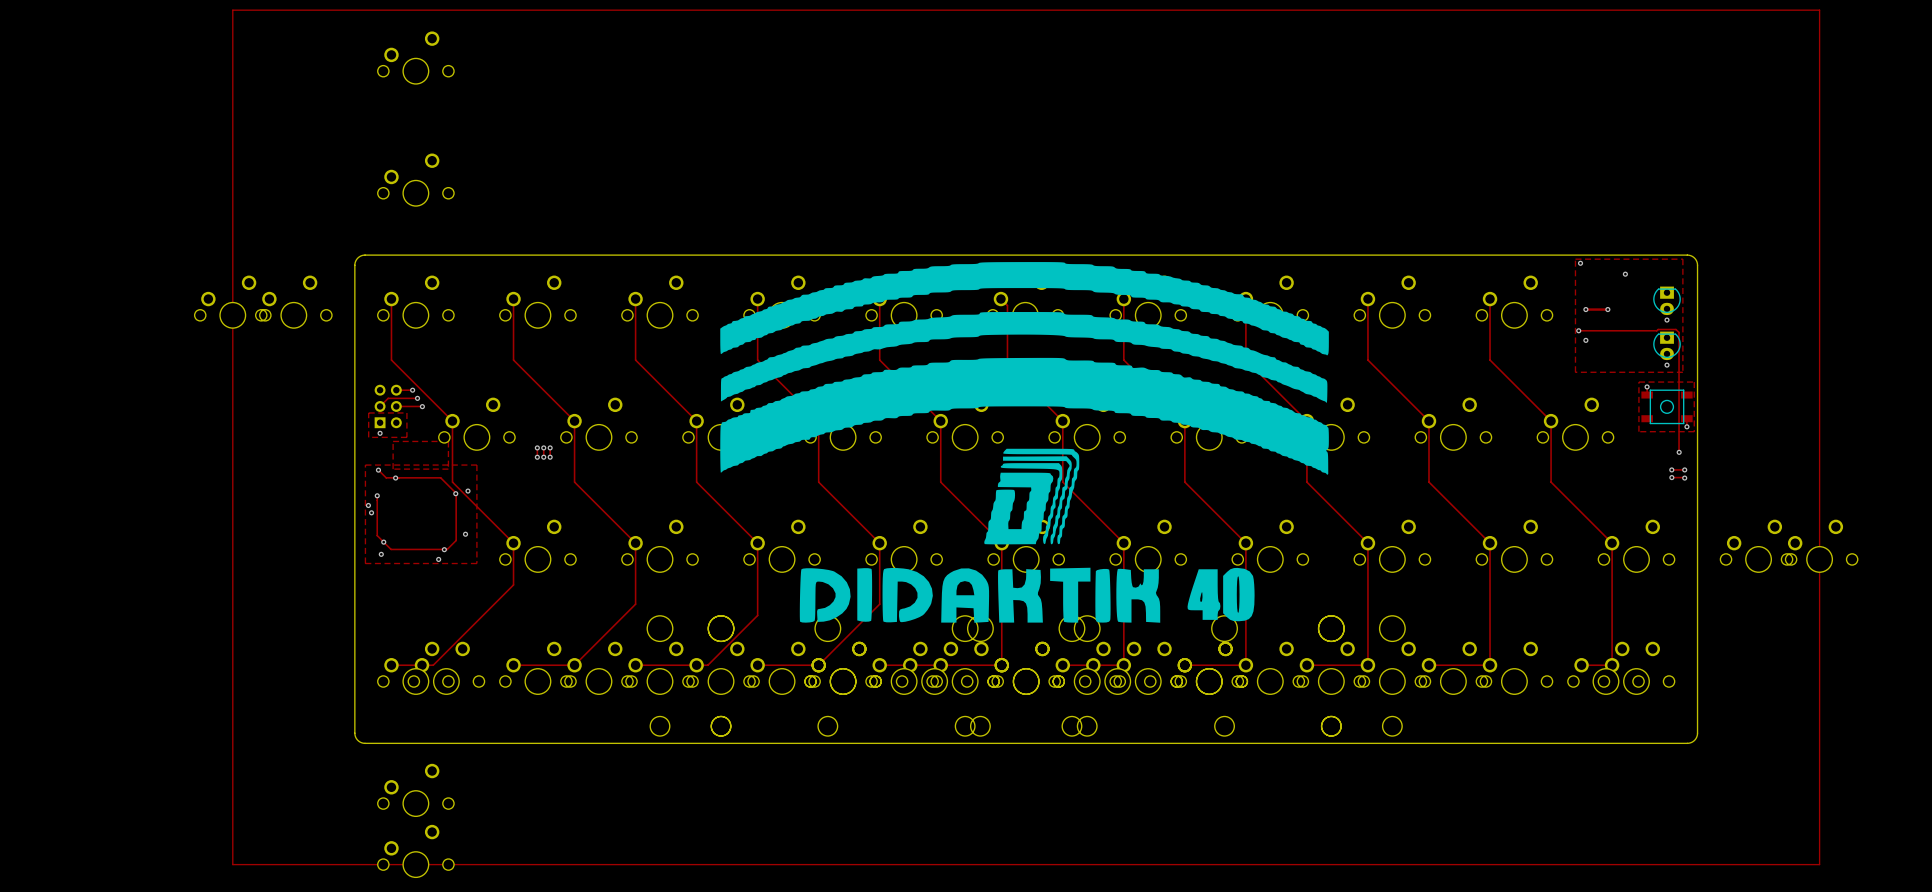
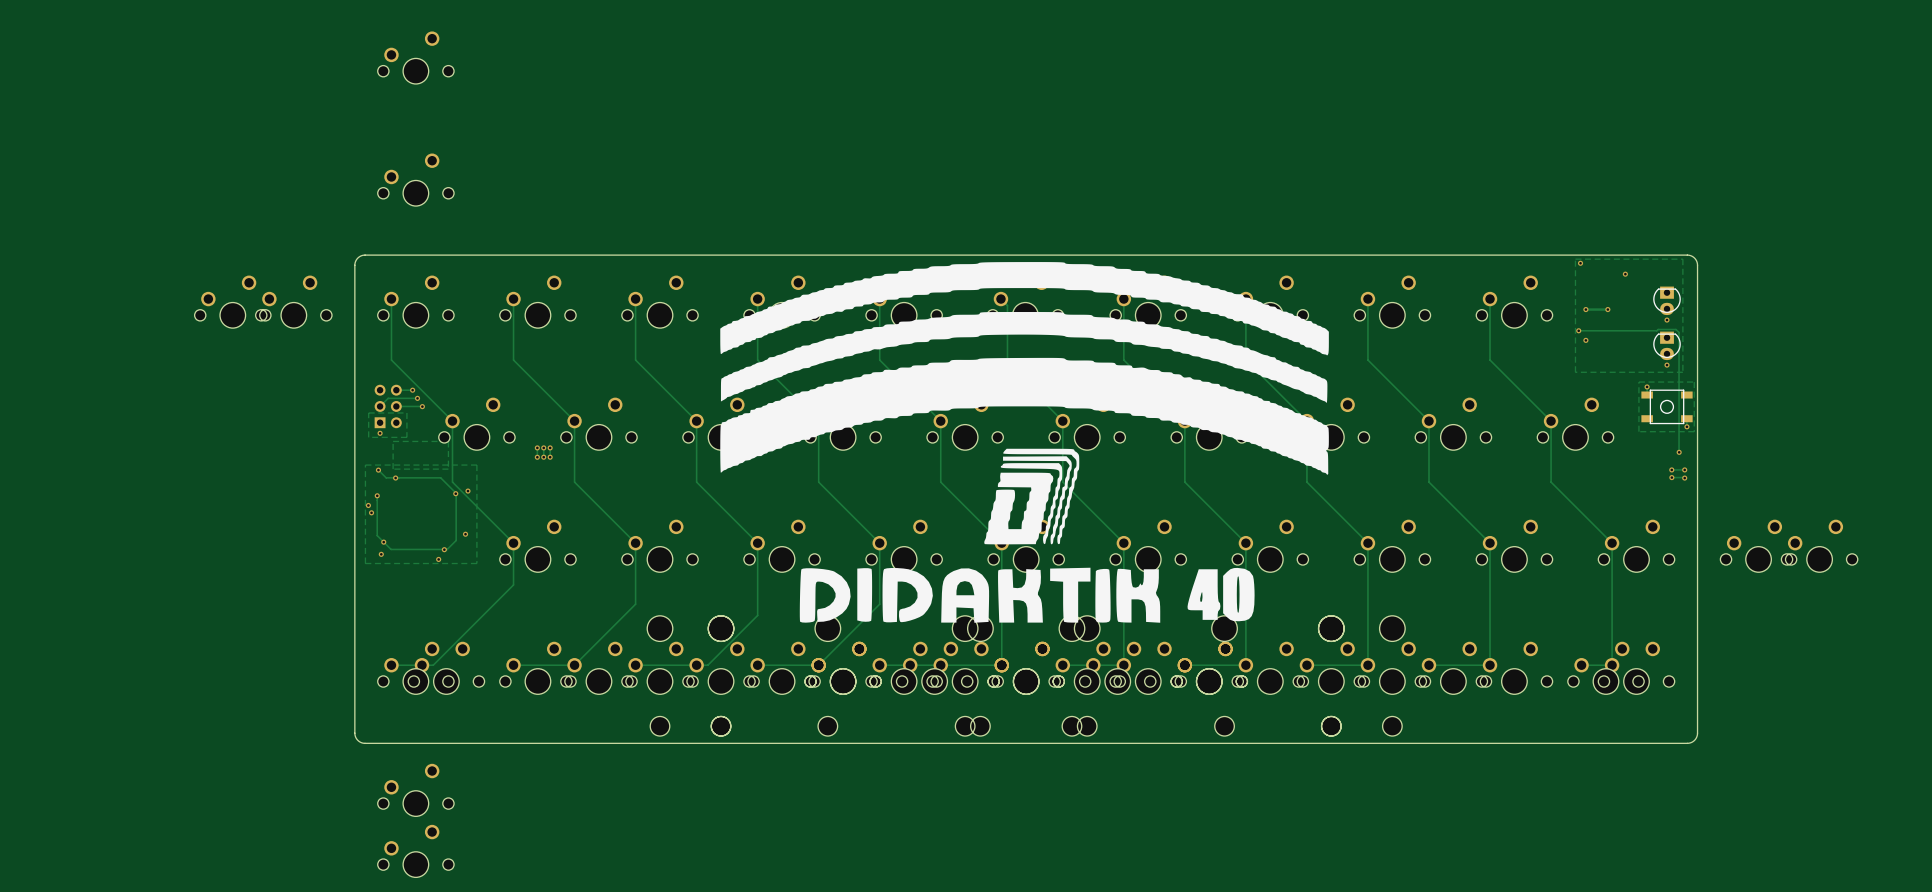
track: (232, 10) (1819, 10) (1819, 864) (232, 864) (232, 10) -> none

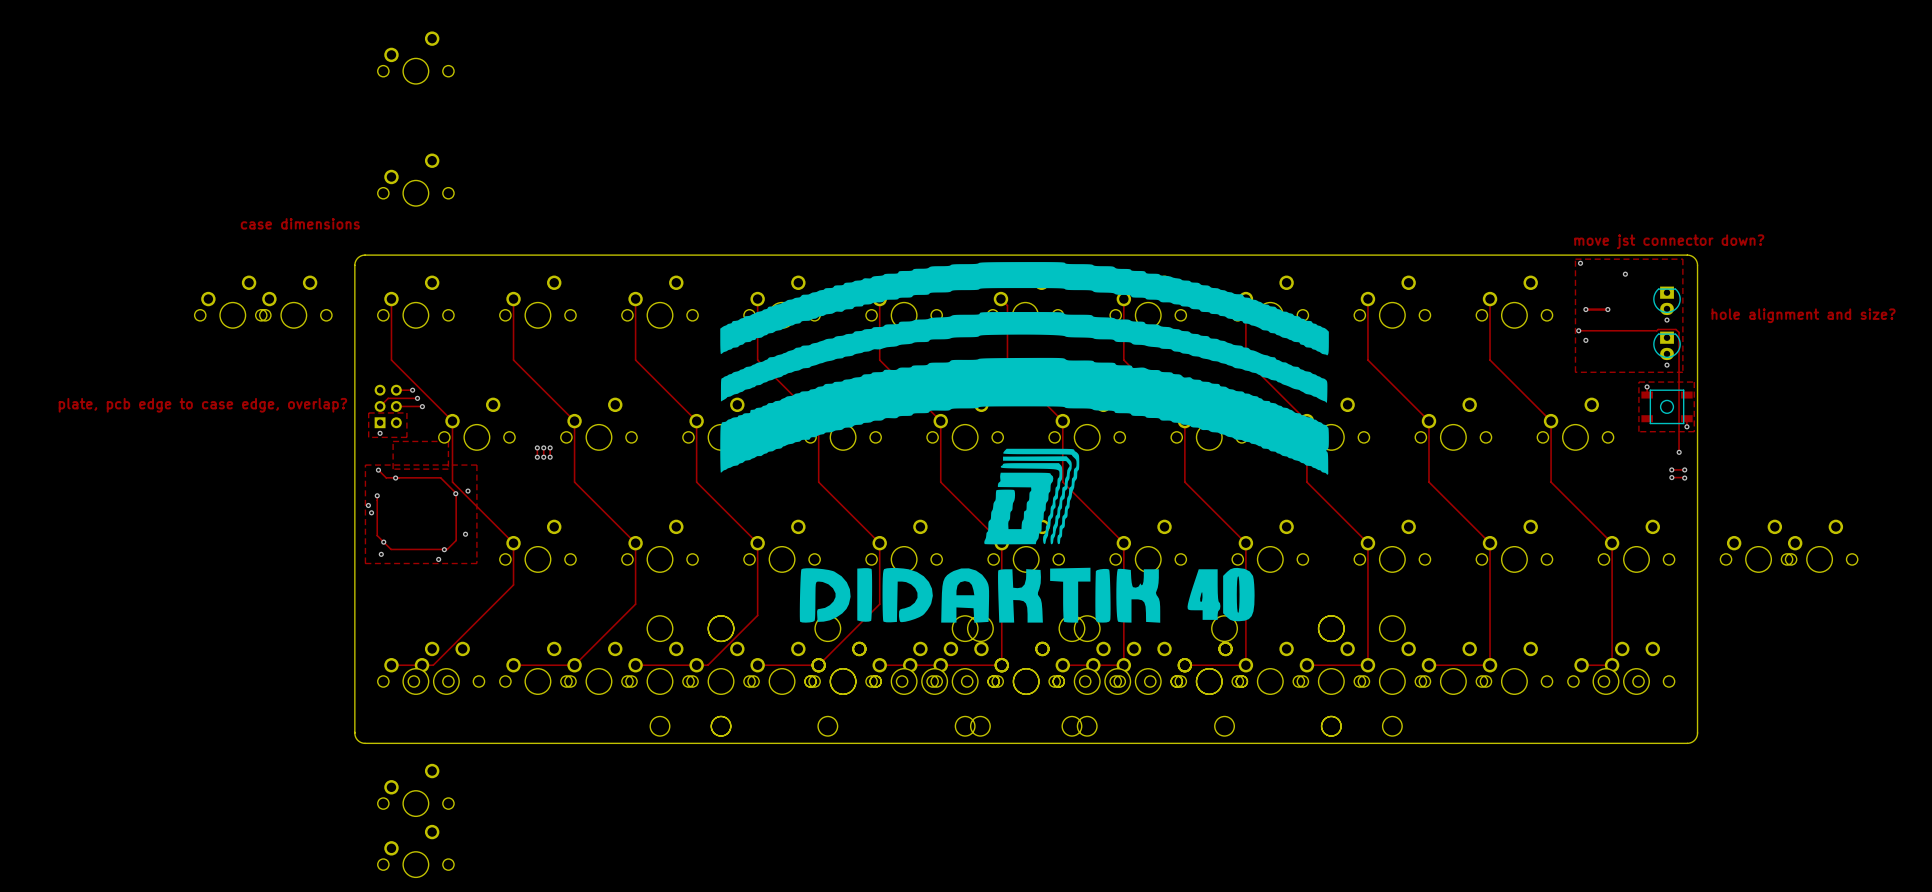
text: none -> case dimensions (300, 223)
text: none -> move jst connector down? (1669, 241)
text: none -> hole alignment and size? (1803, 315)
text: none -> plate, pcb edge to case edge, overlap? (202, 405)

